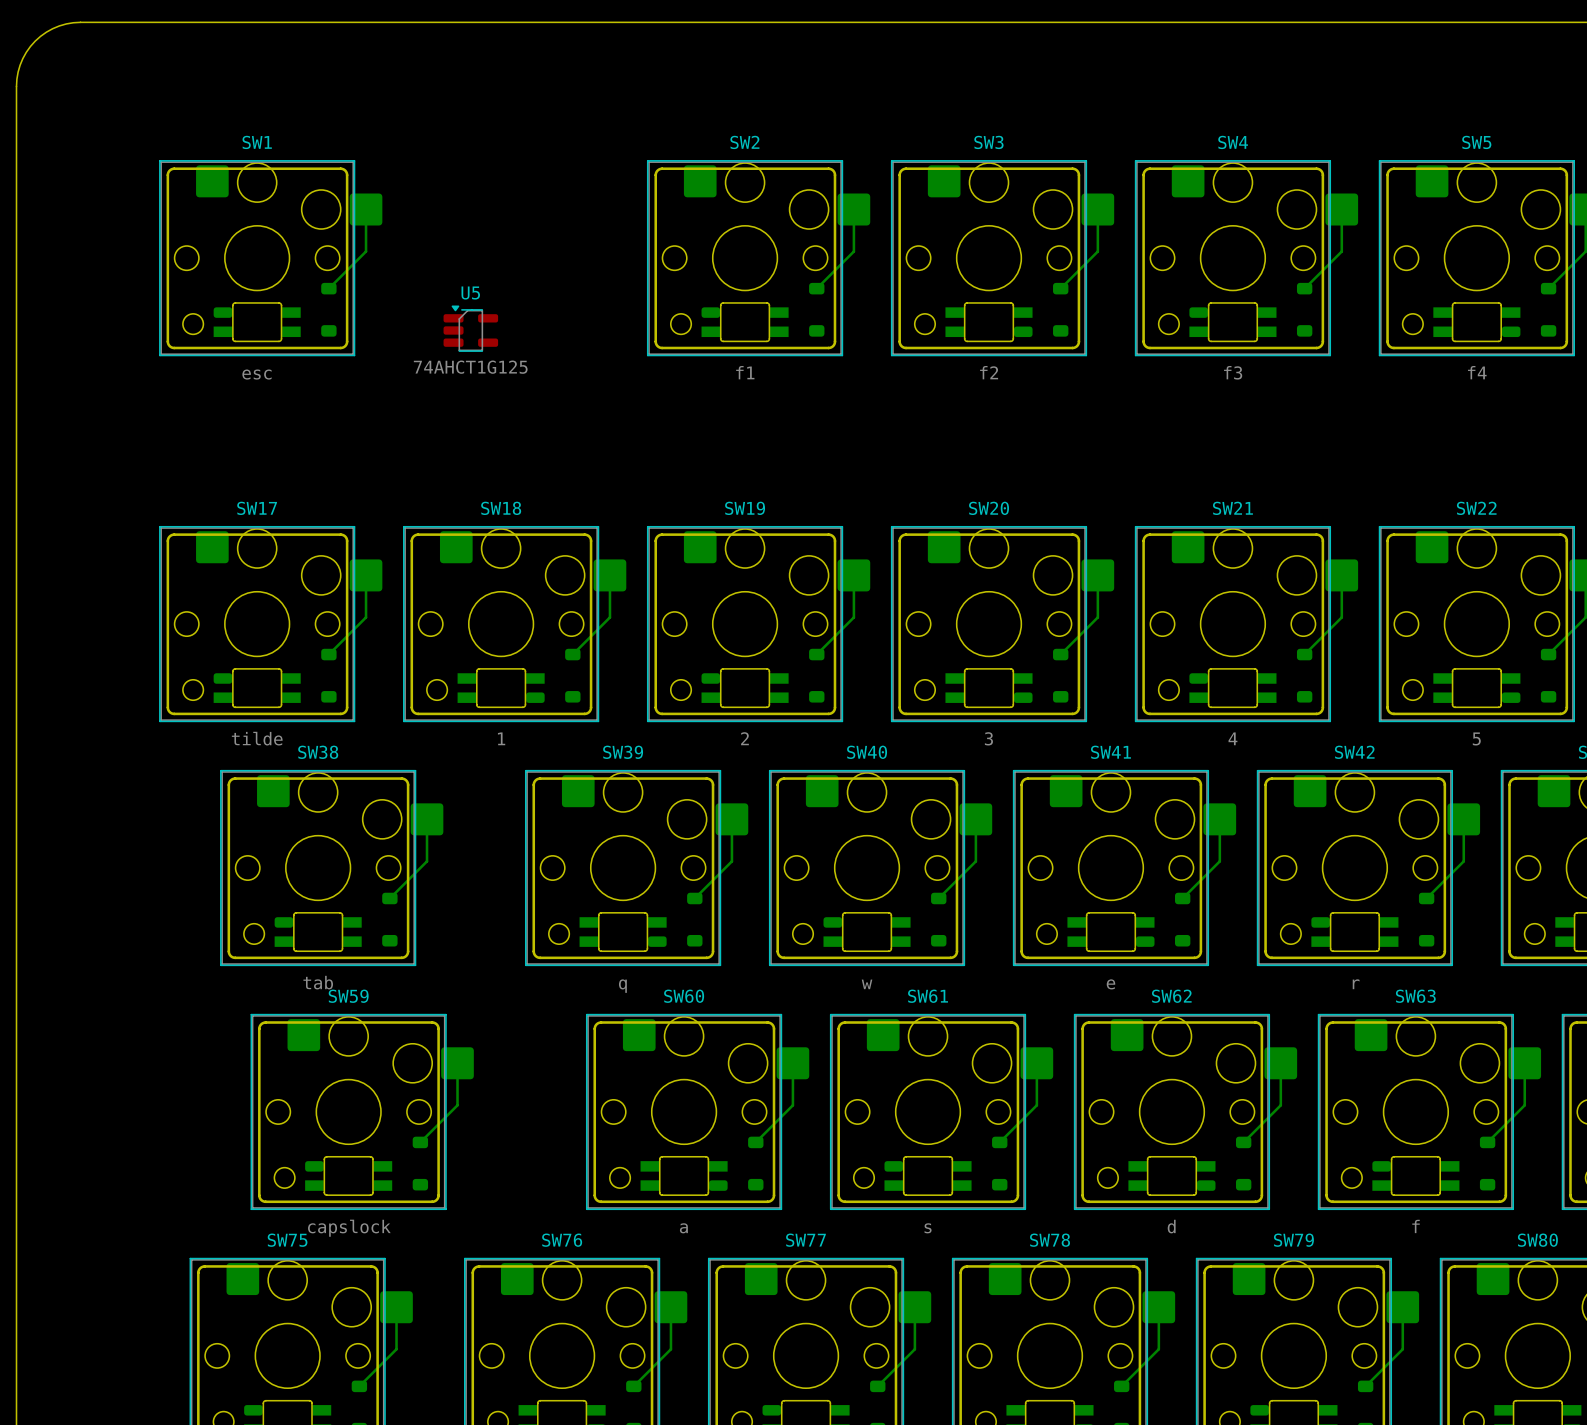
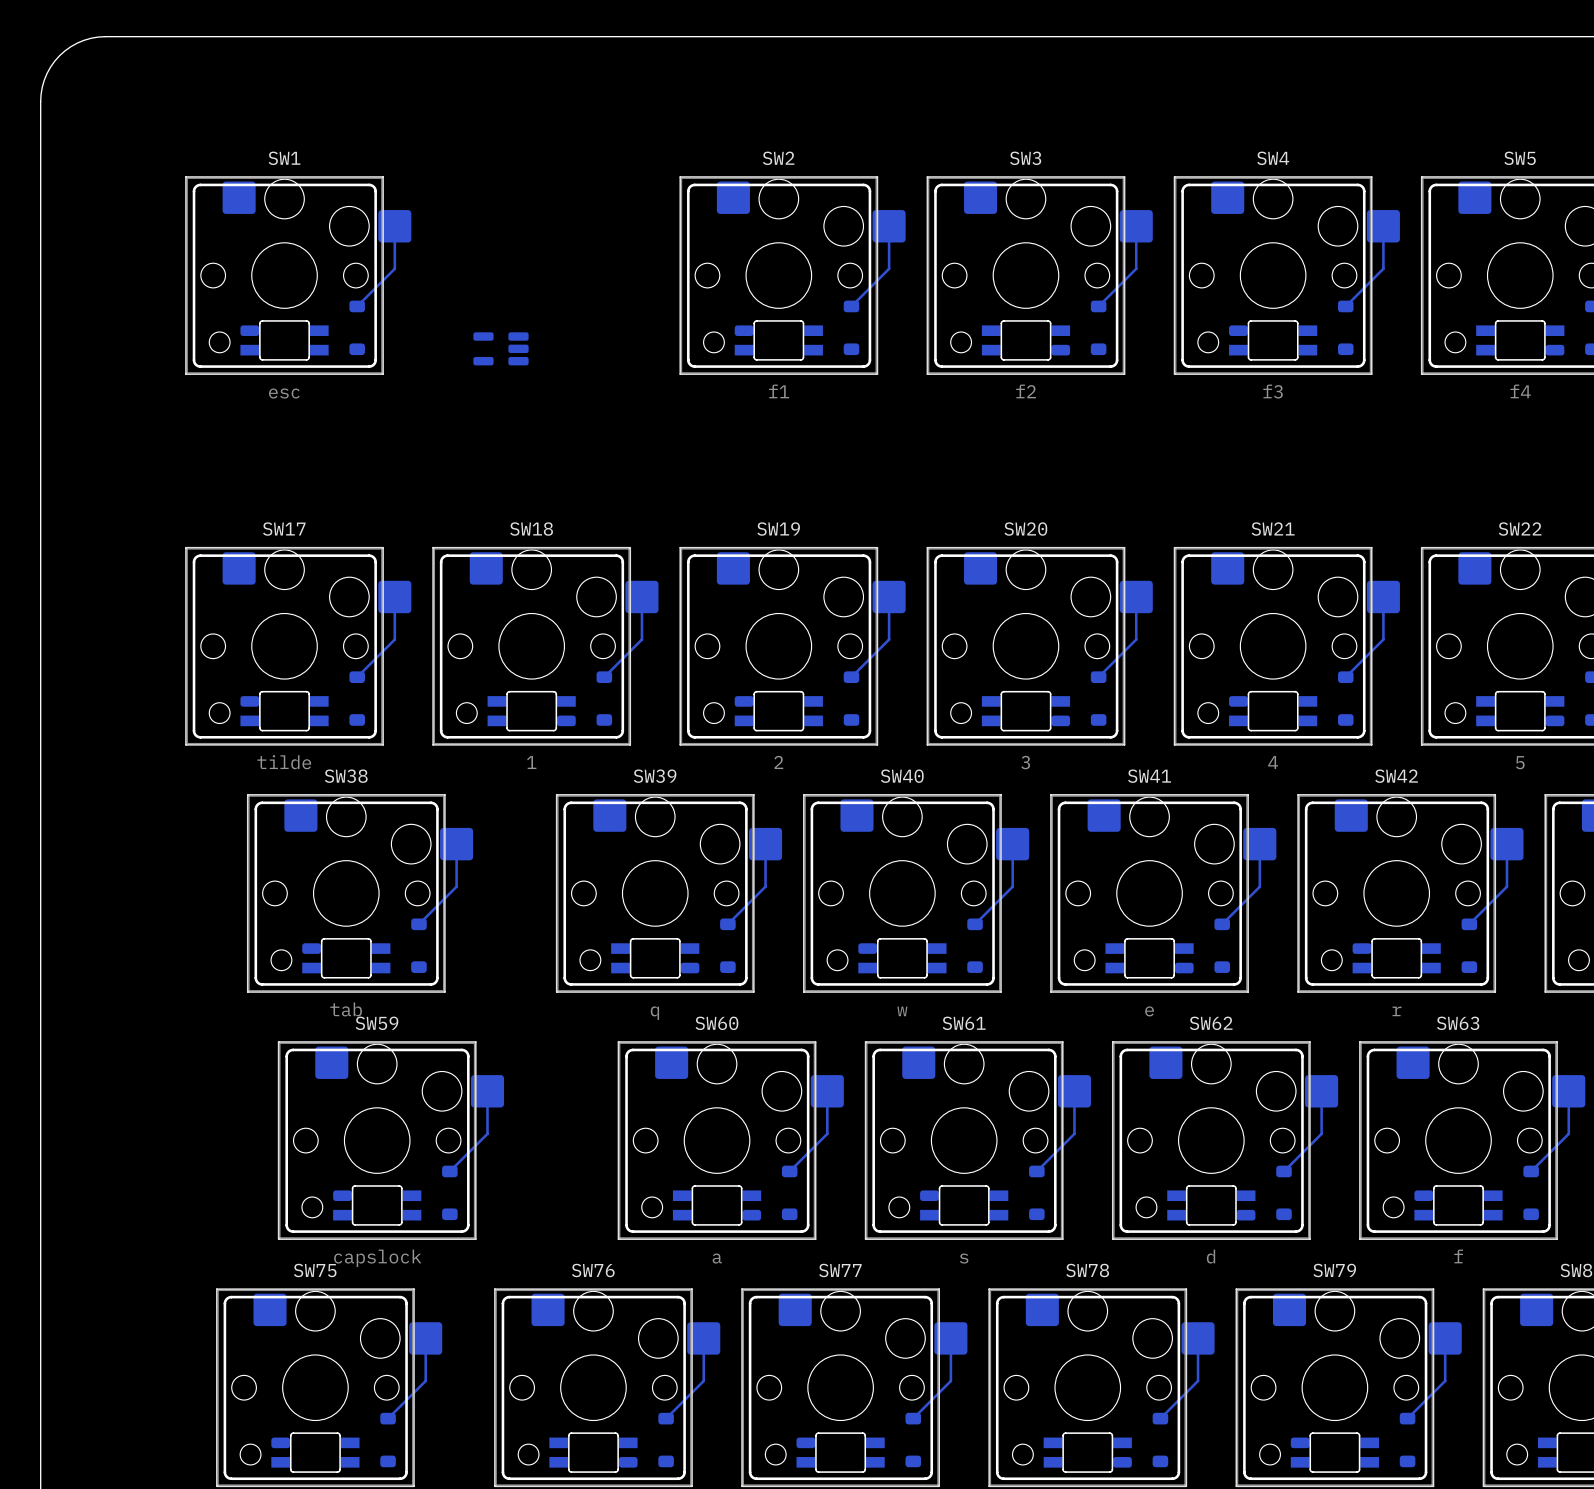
U5 side: top (470, 328) -> bottom (500, 348)

